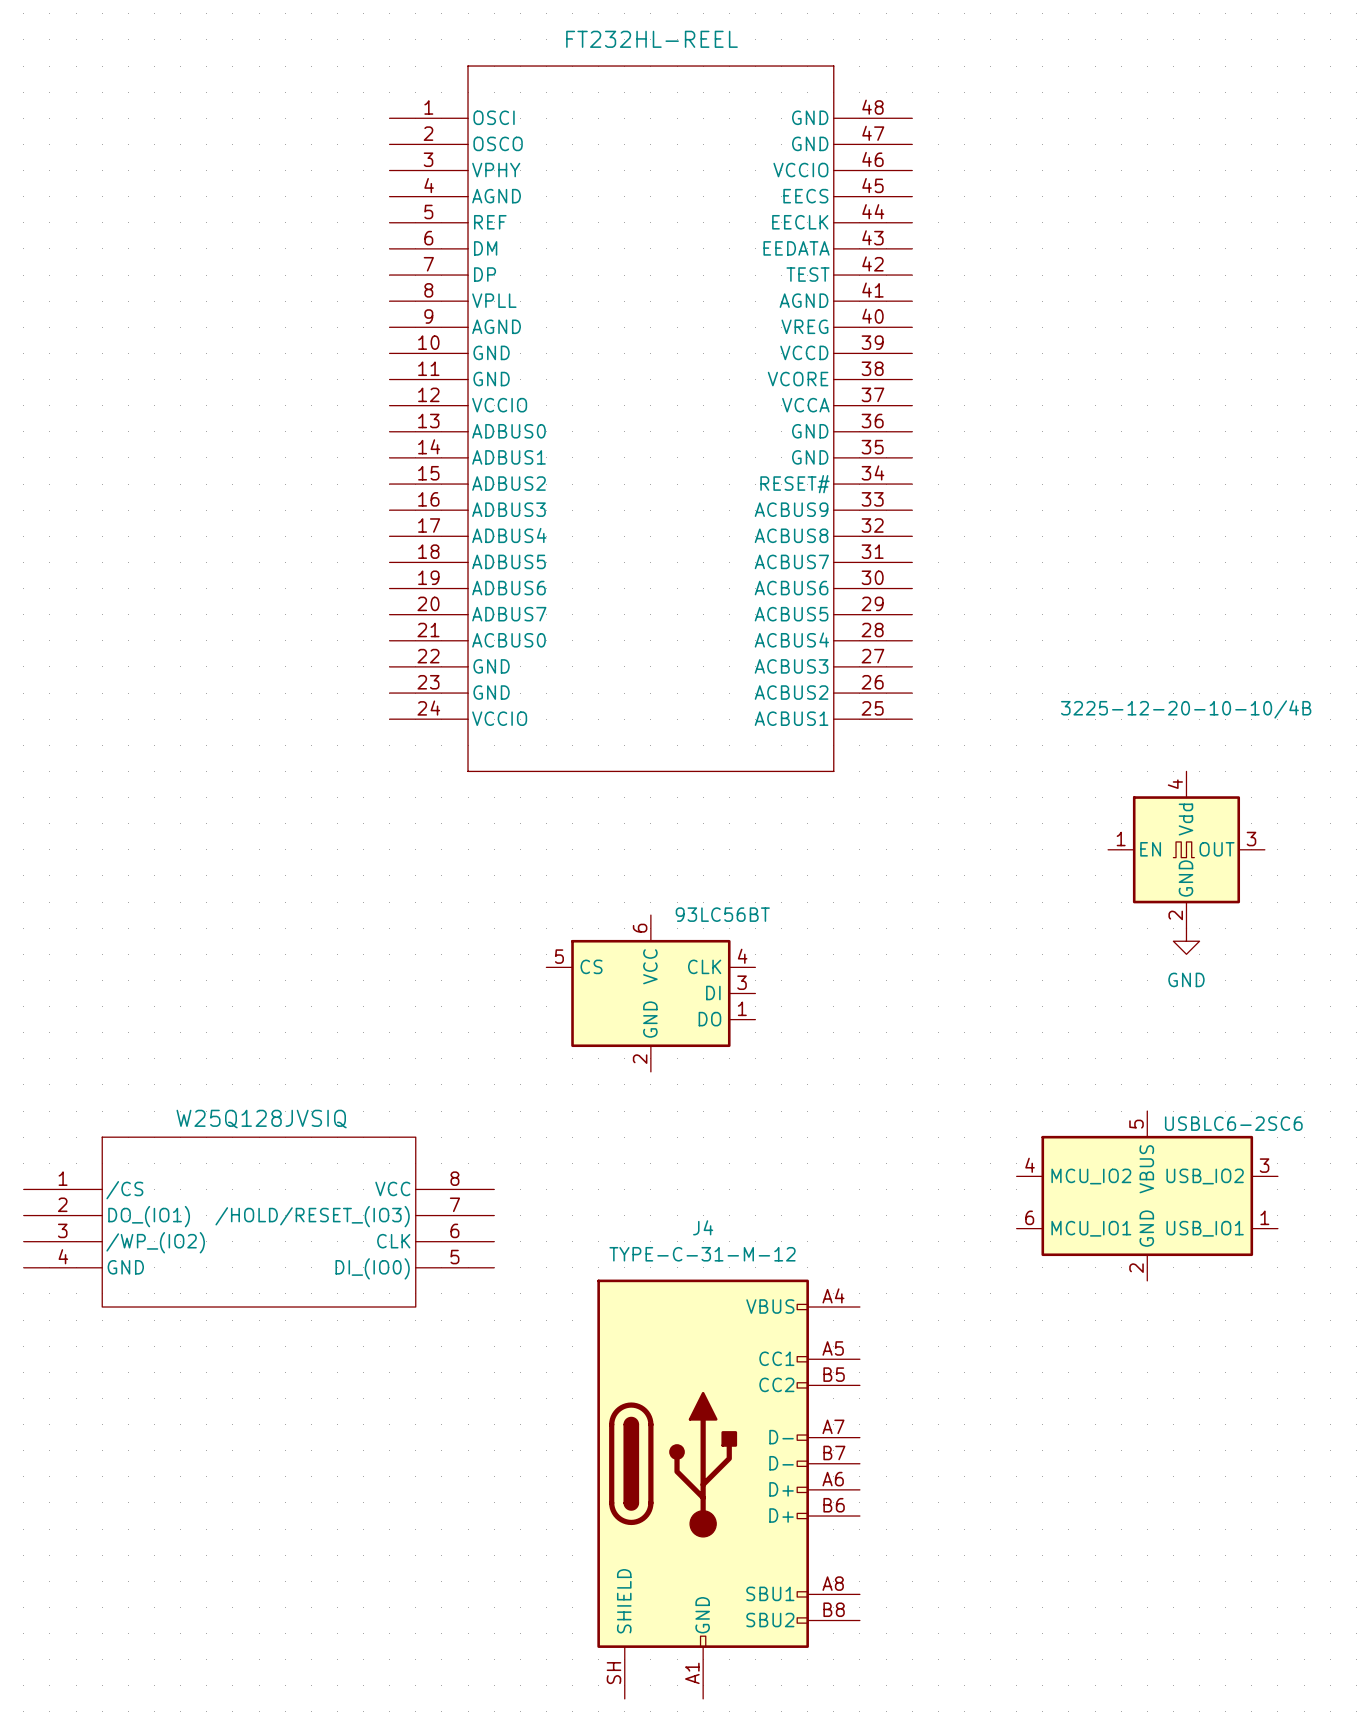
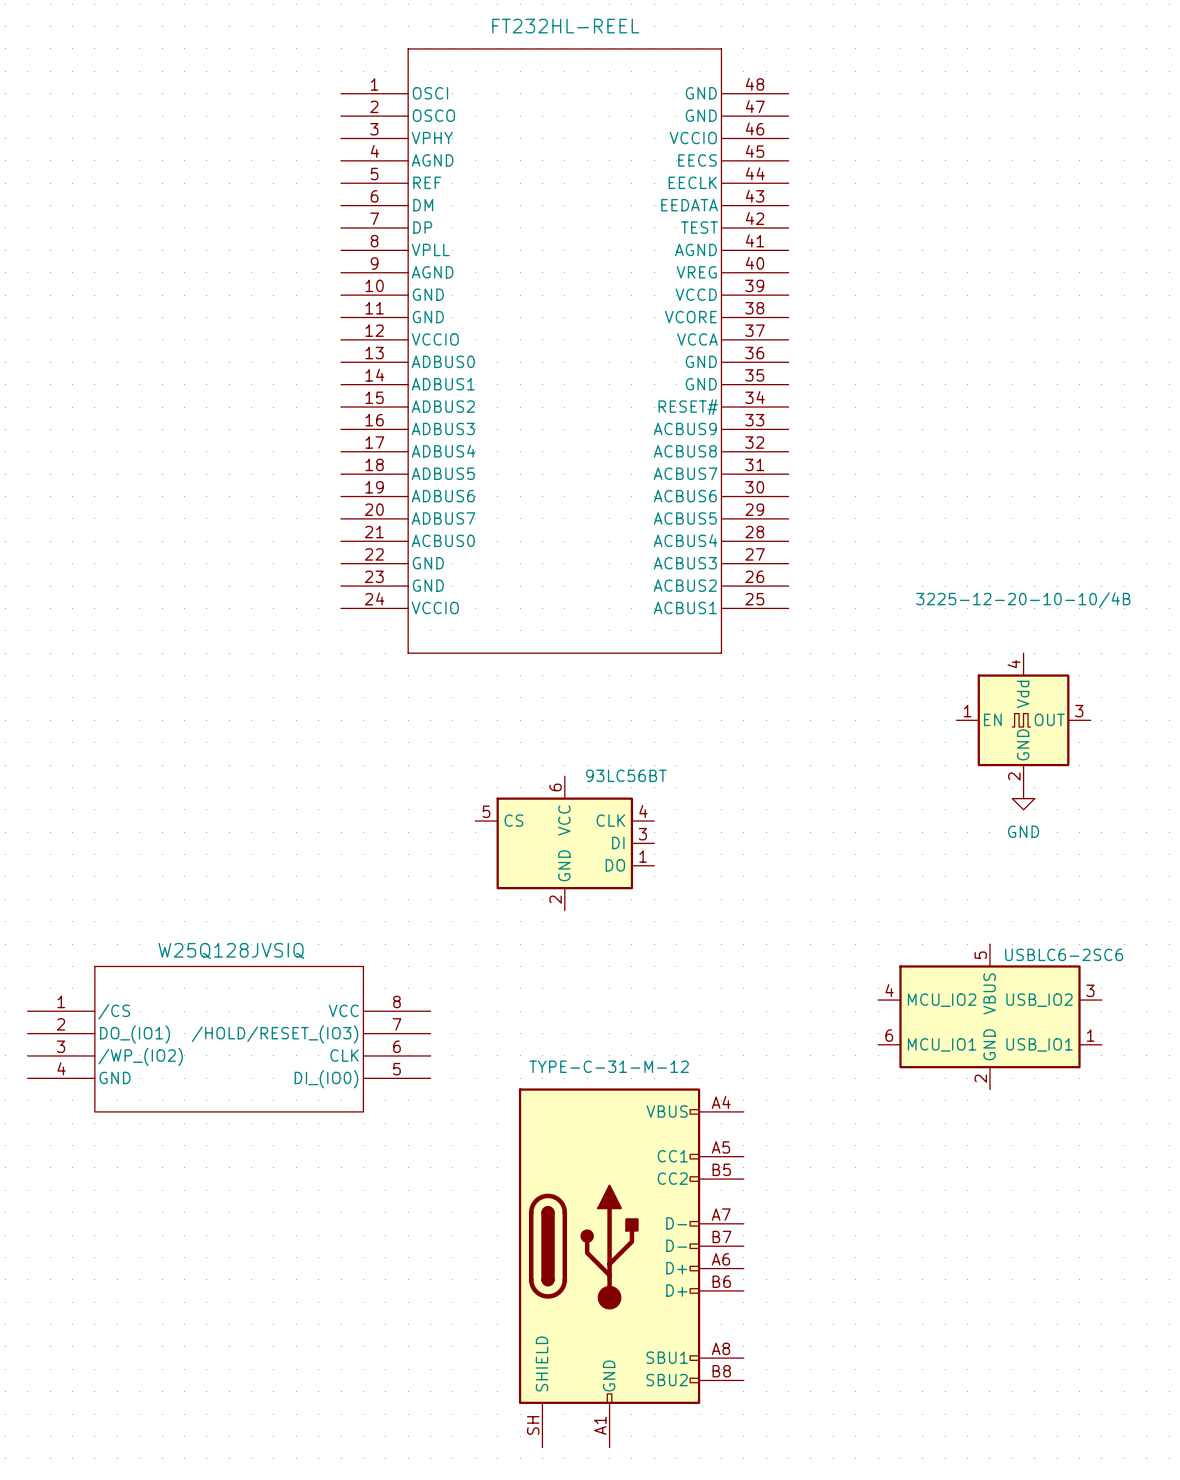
J4 name: J4 (703, 1227) -> none

